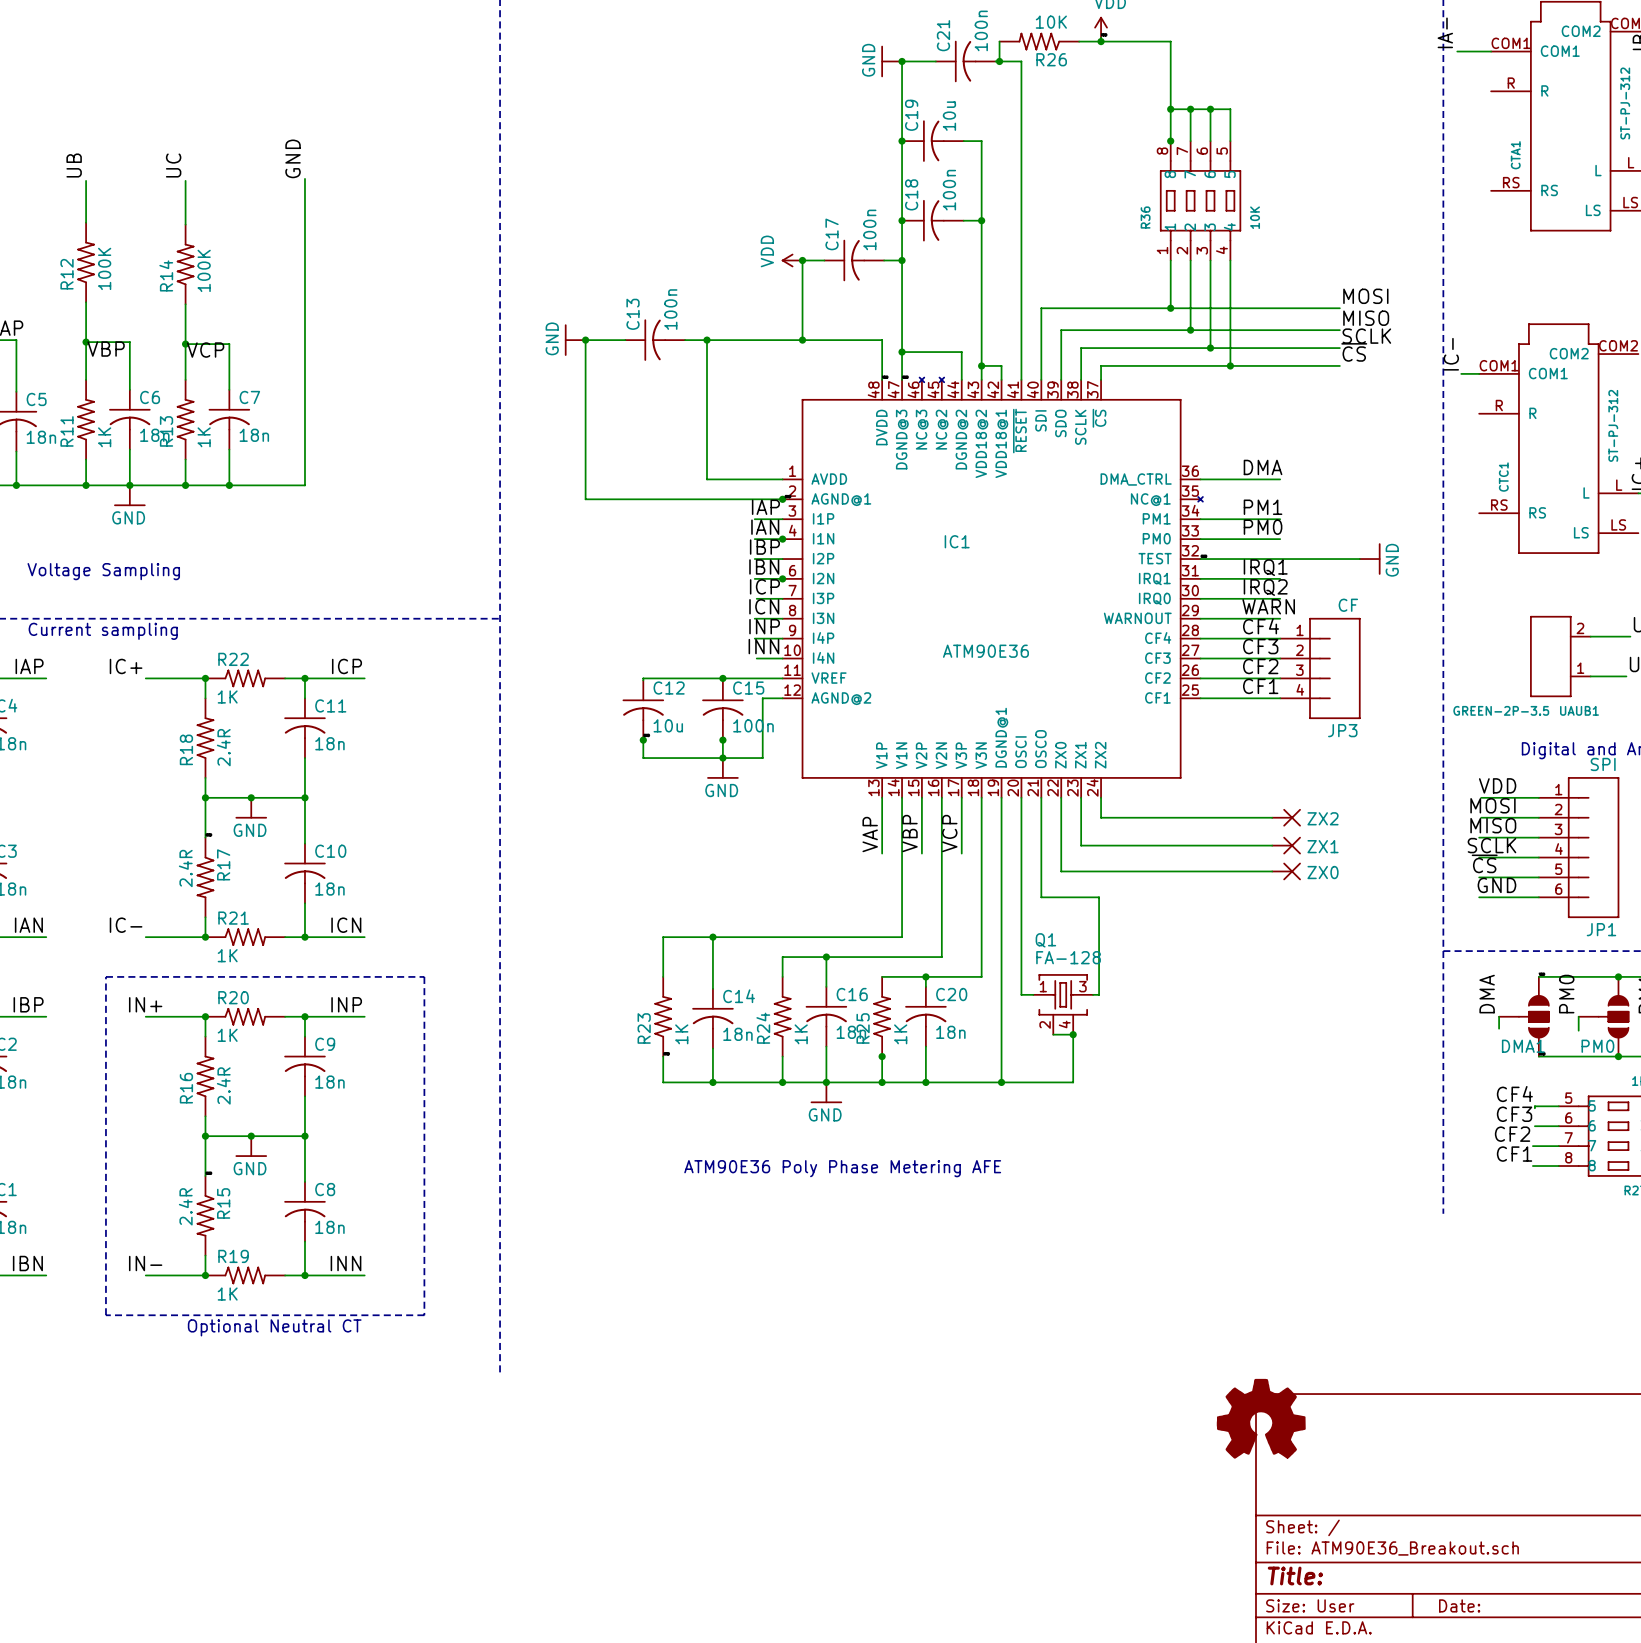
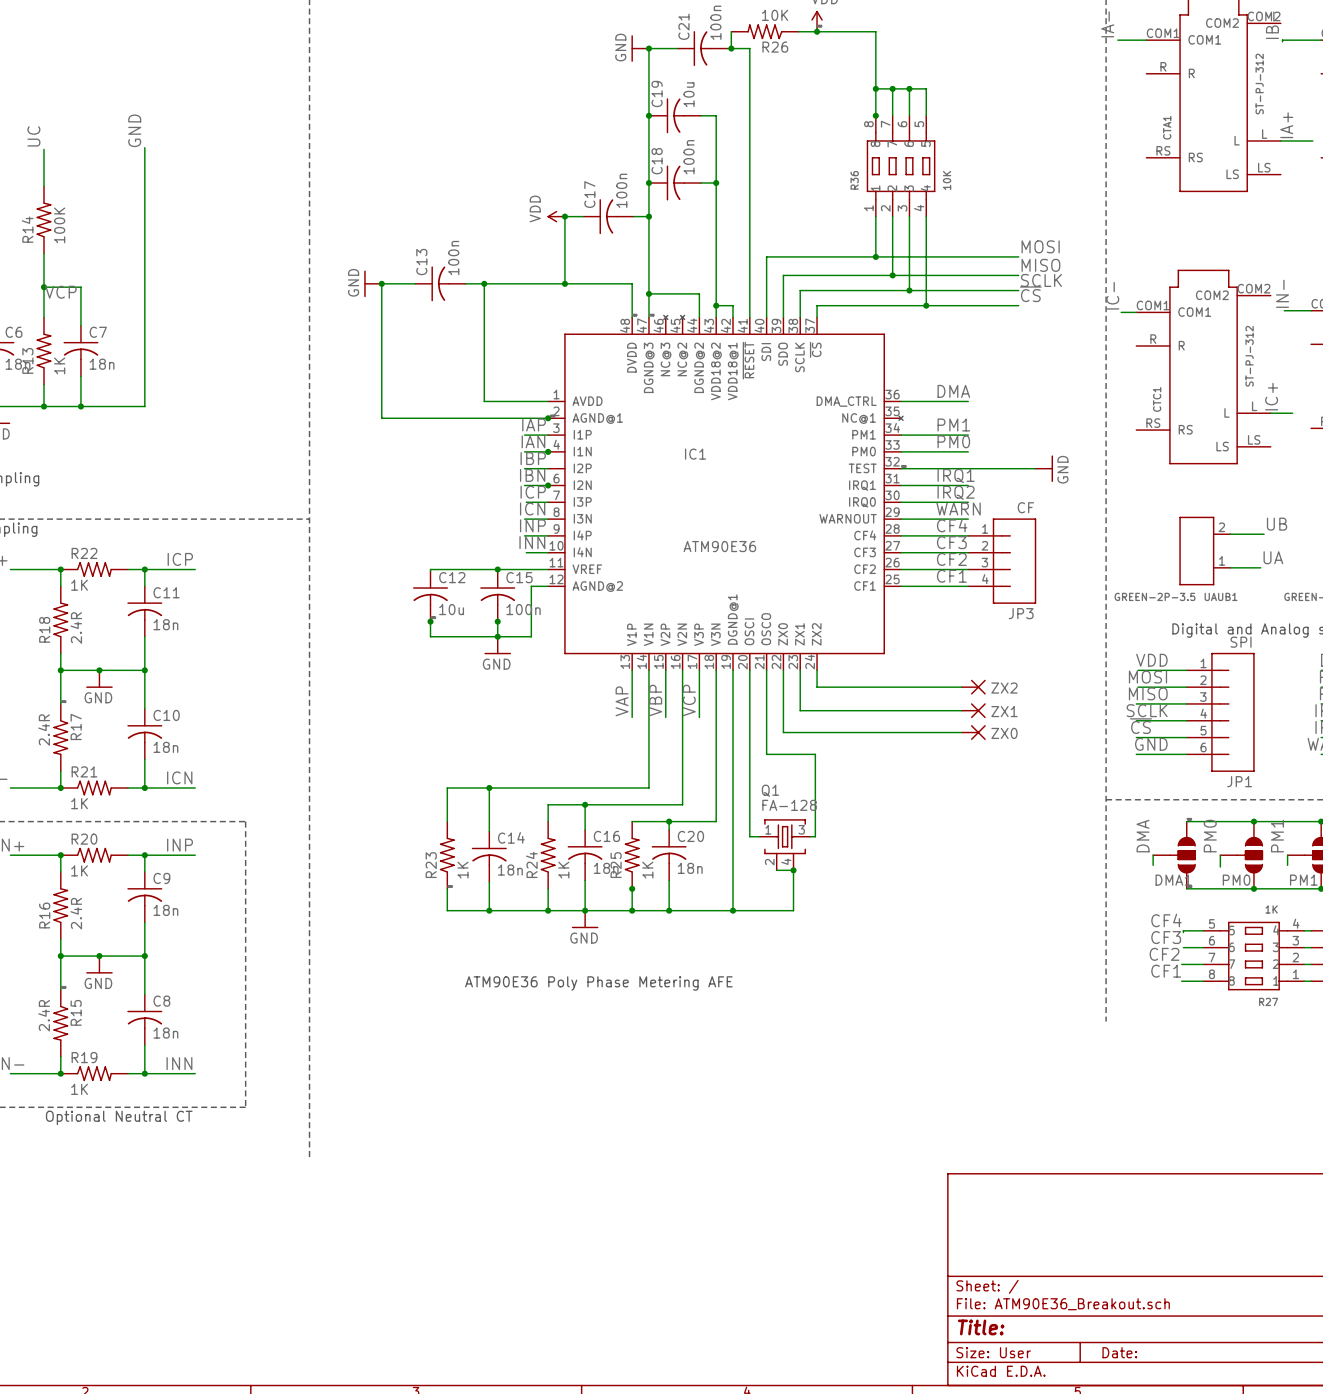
part: (1261, 1418) -> none

